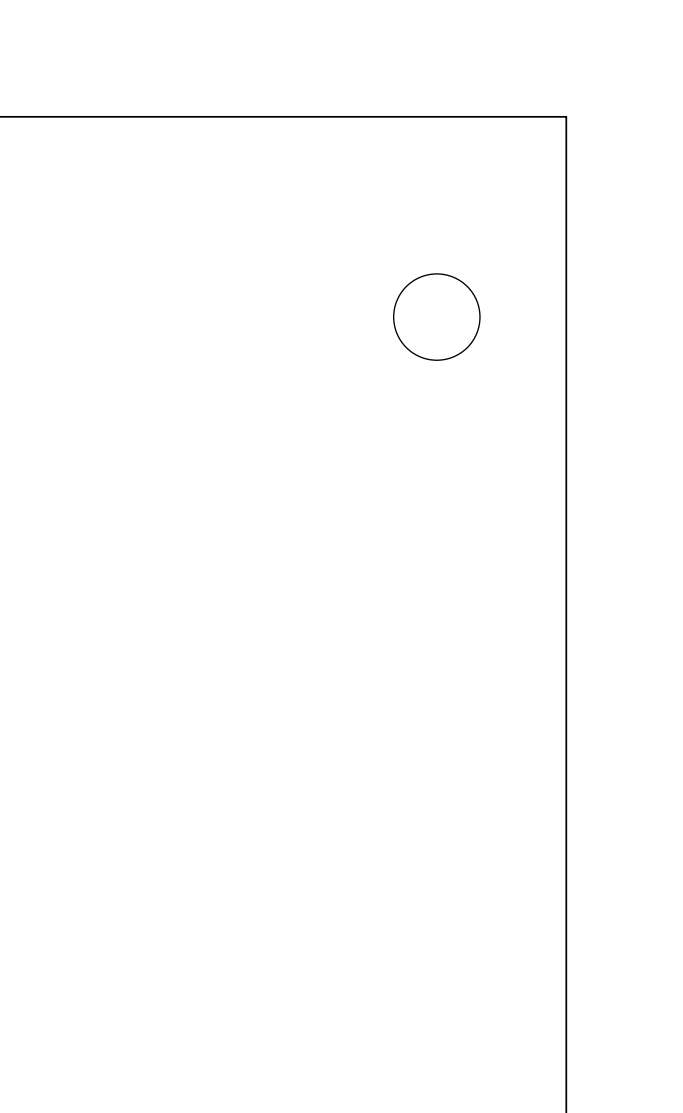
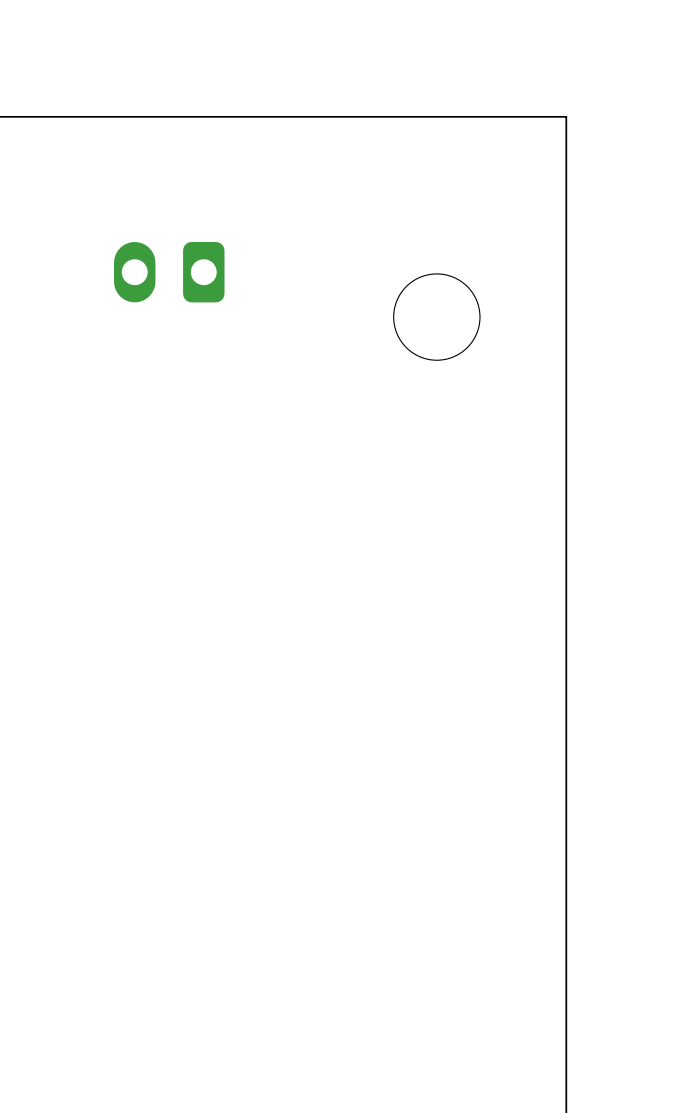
part: none -> (169, 272)

